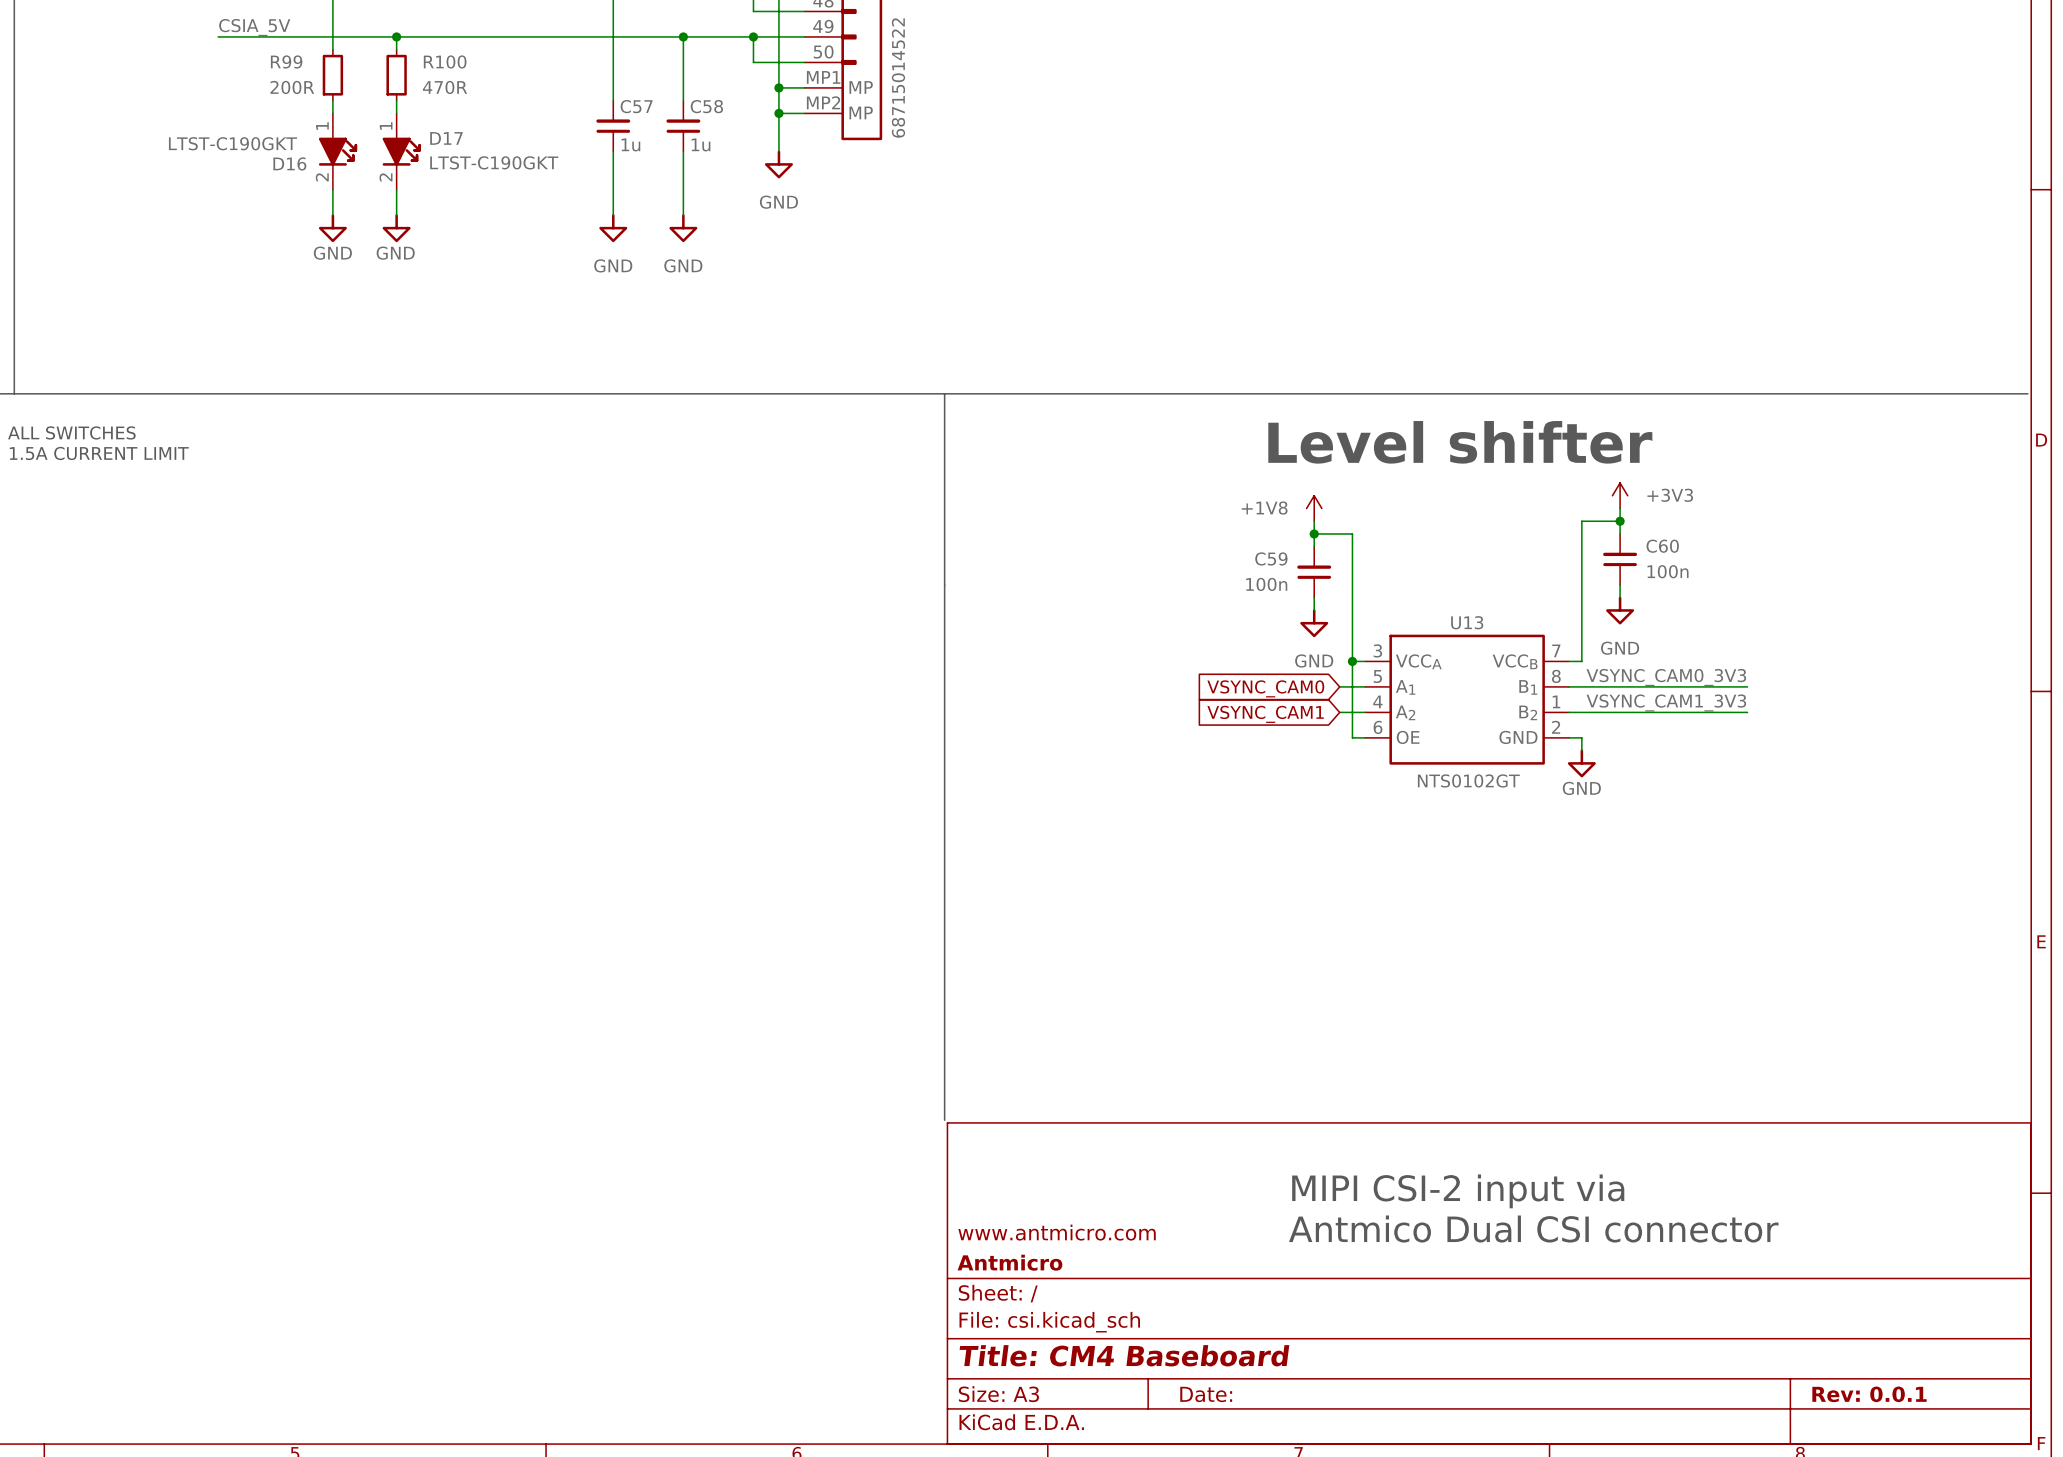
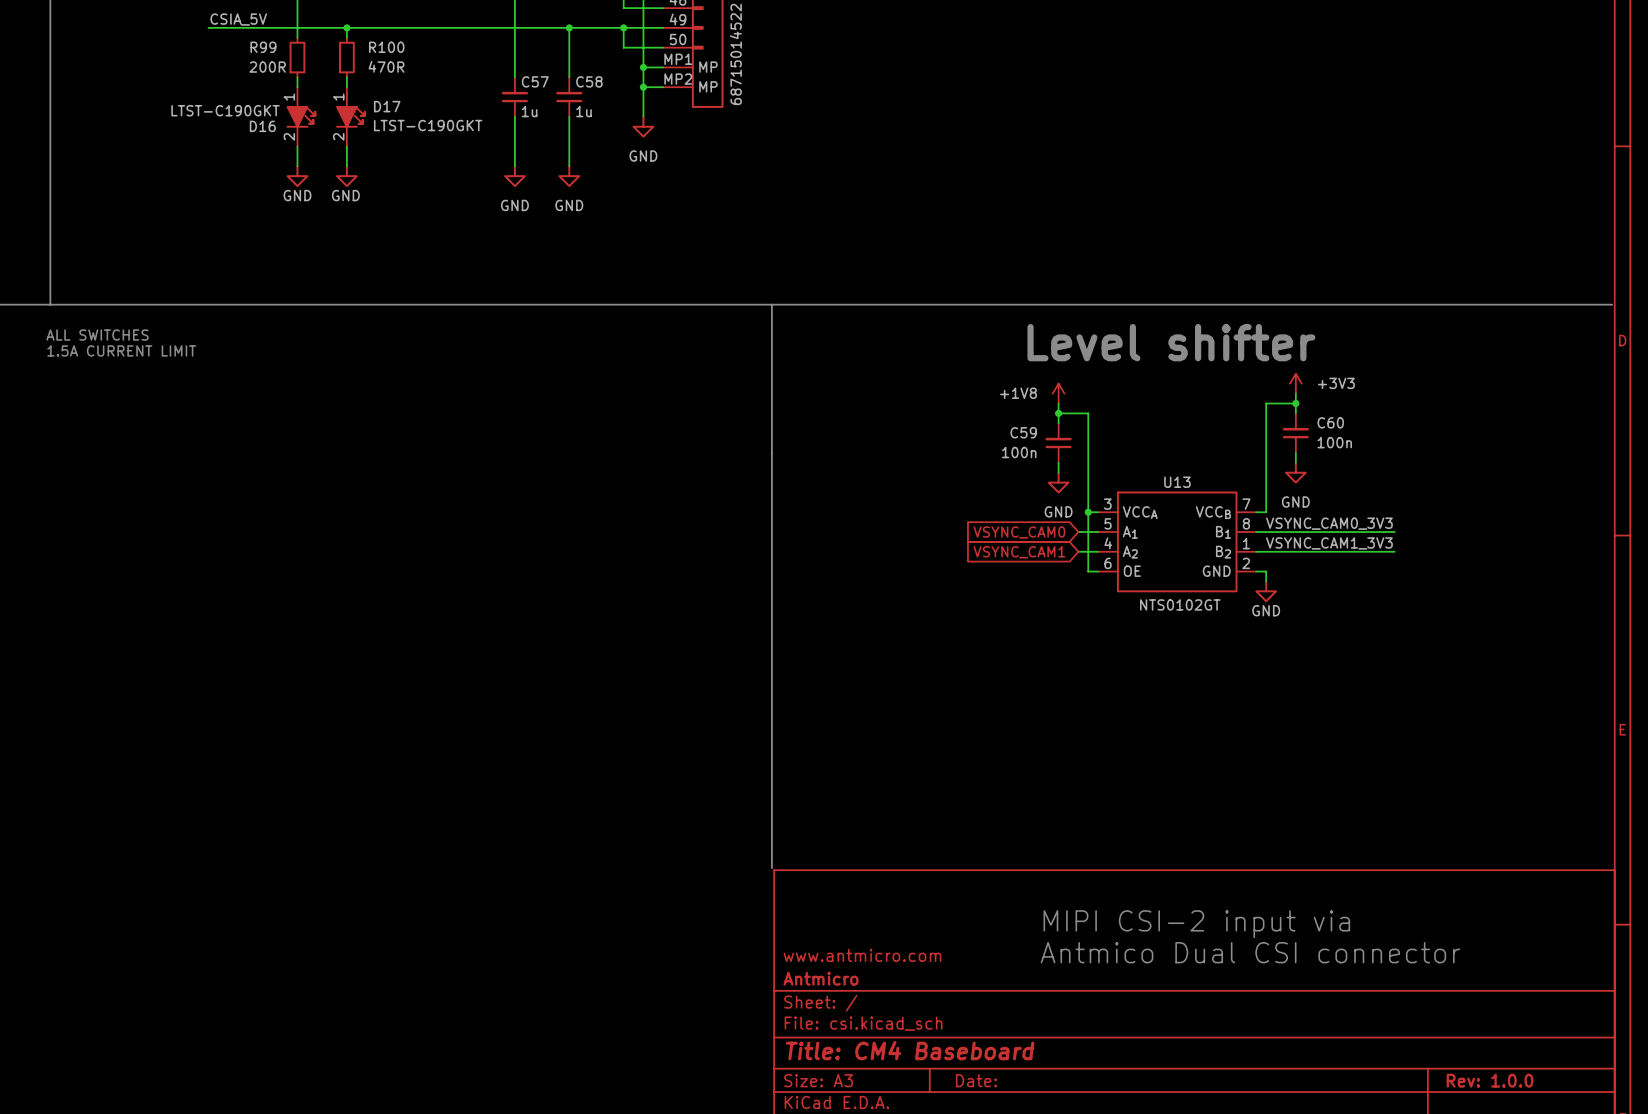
title block: Rev: 0.0.1 (1869, 1394) -> Rev: 1.0.0 (1490, 1080)

